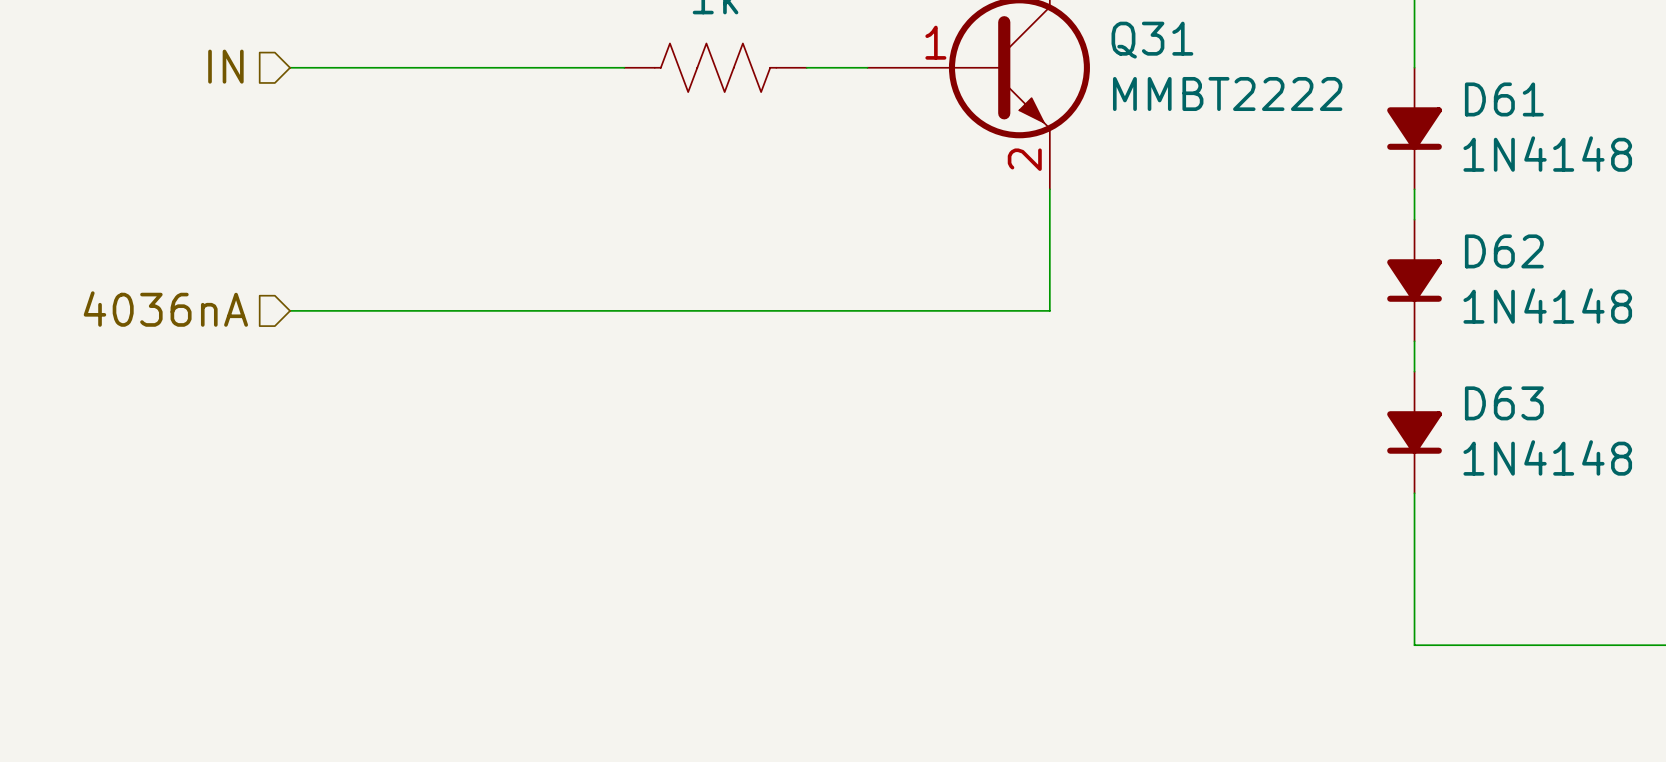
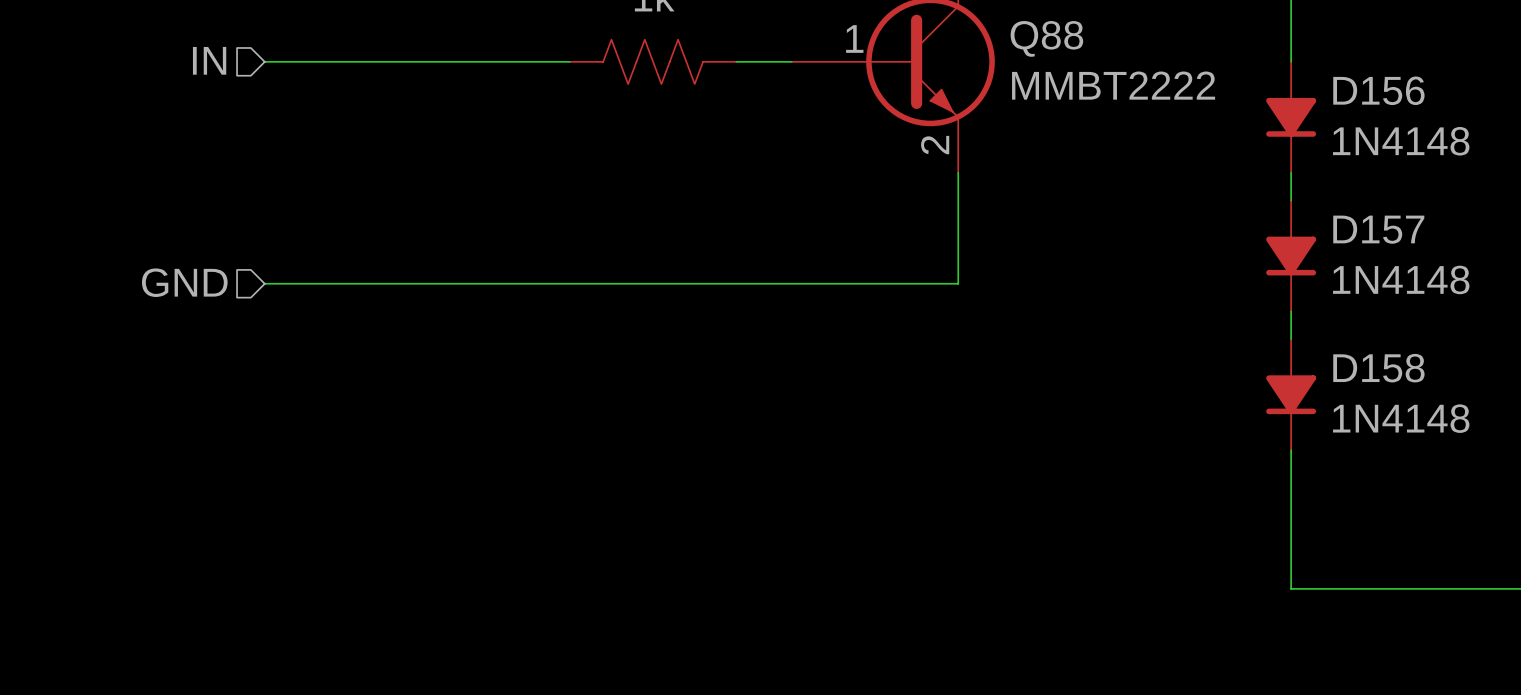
Q31 name: Q31 (1152, 40) -> Q88 (1046, 38)
D61 name: D61 (1504, 99) -> D156 (1378, 90)
D62 name: D62 (1504, 251) -> D157 (1378, 229)
hierarchical label: 4036nA (165, 309) -> GND (184, 282)
D63 name: D63 (1504, 403) -> D158 (1378, 368)

